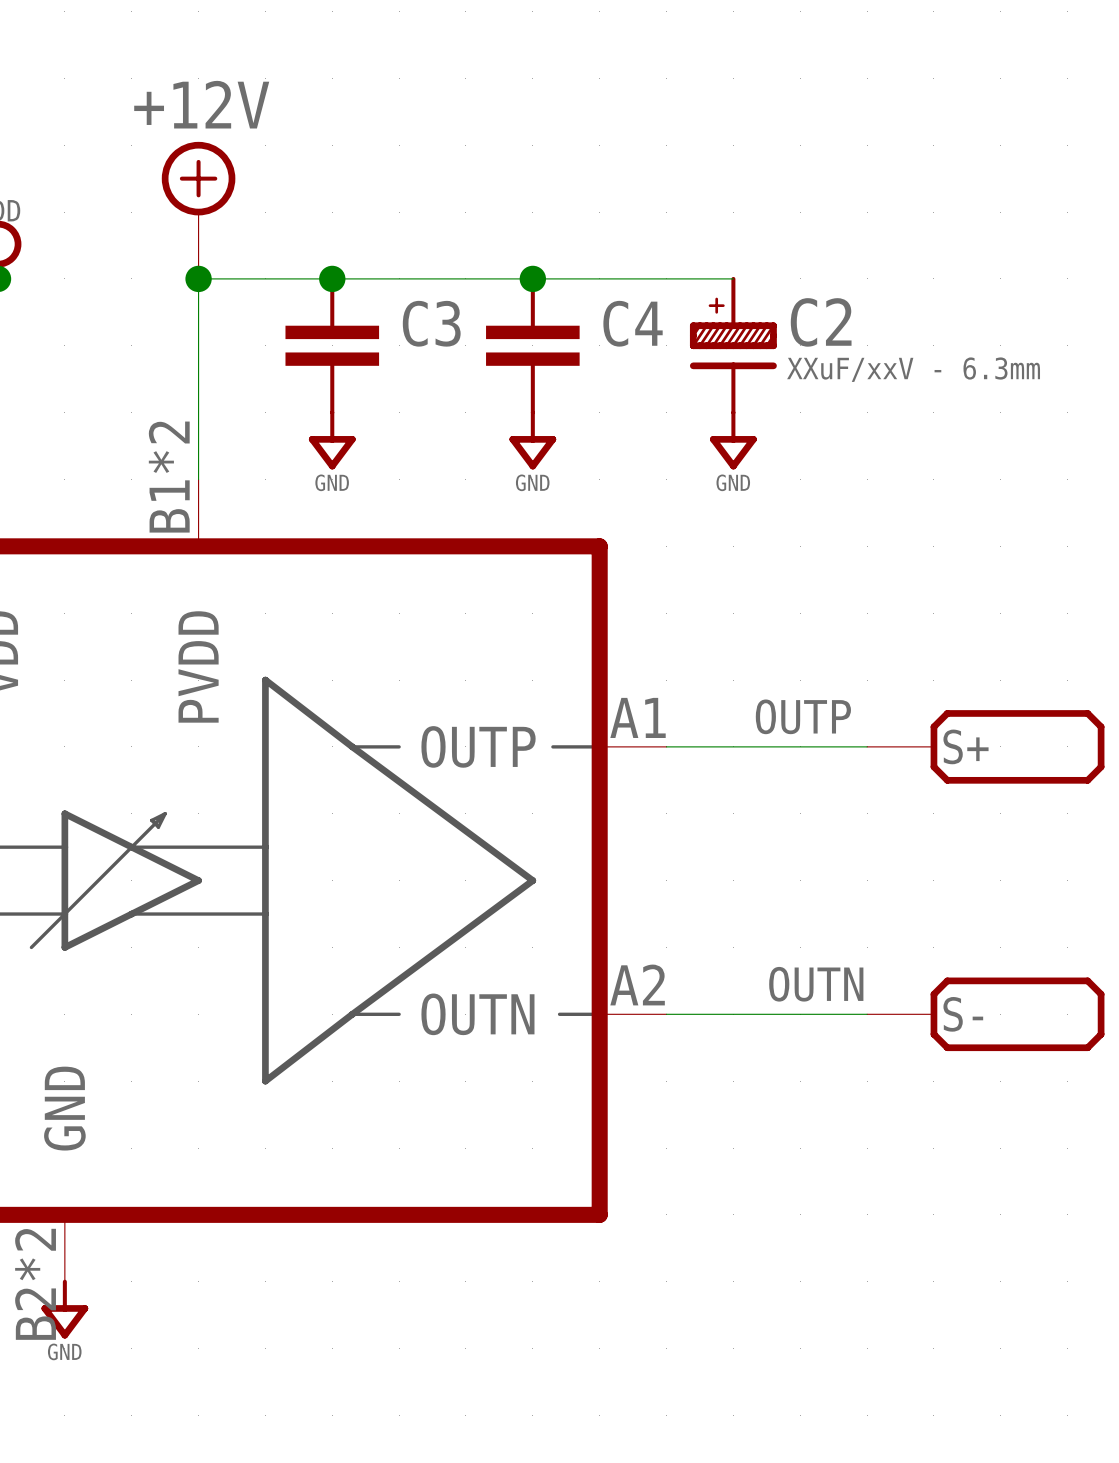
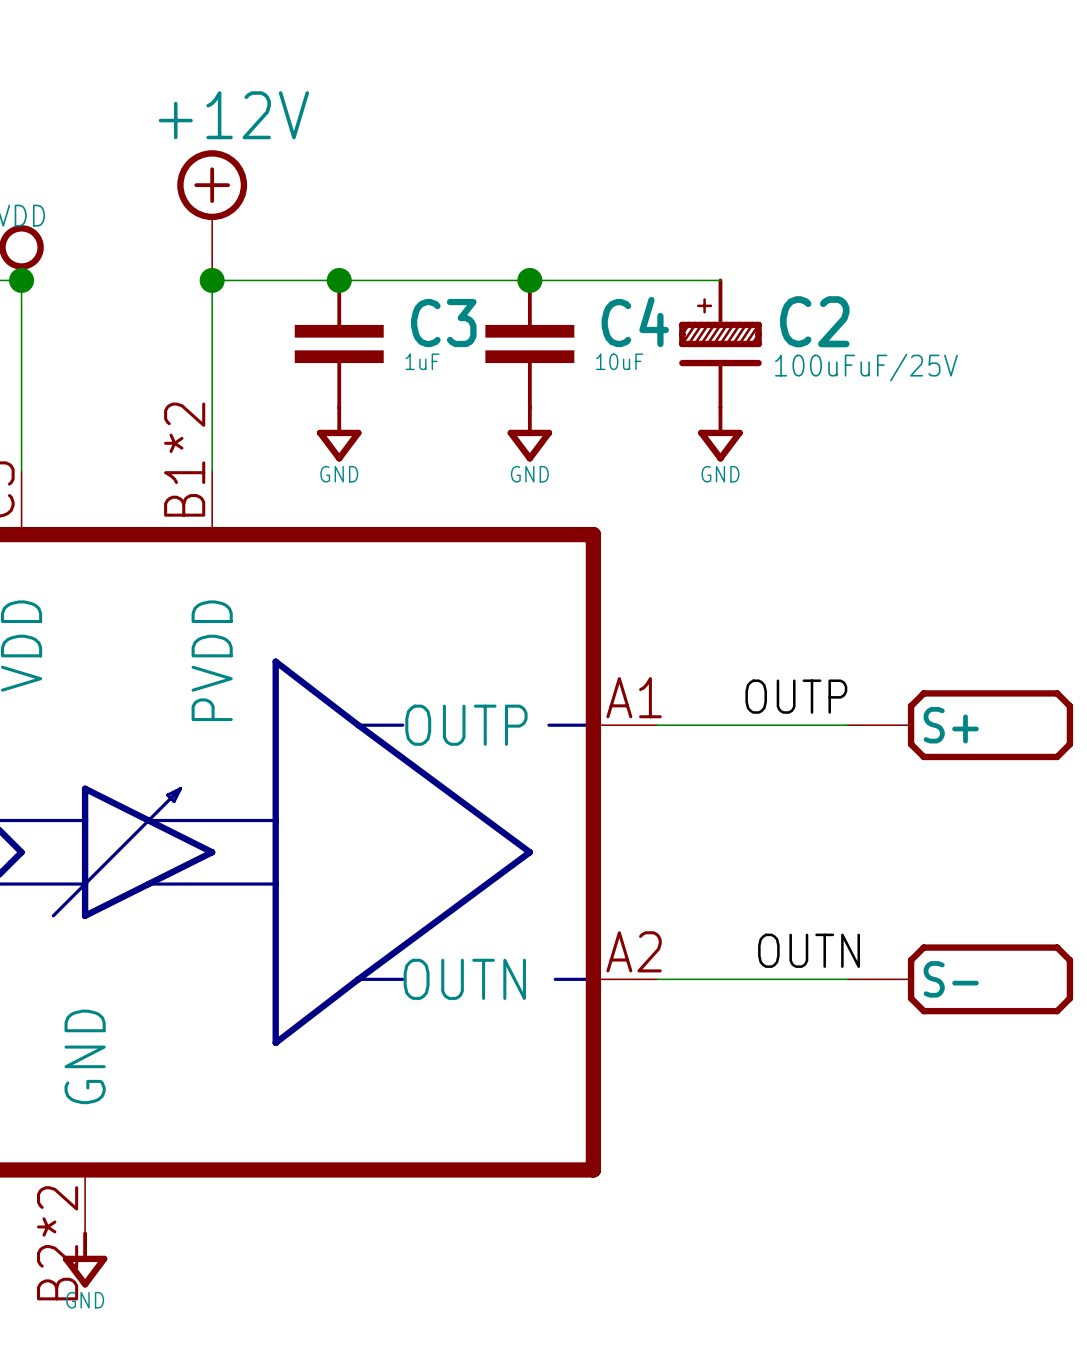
C3 value: none -> 1uF (422, 361)
C4 value: none -> 10uF (619, 361)
C2 value: XXuF/xxV - 6.3mm (913, 369) -> 100uFuF/25V (866, 367)

